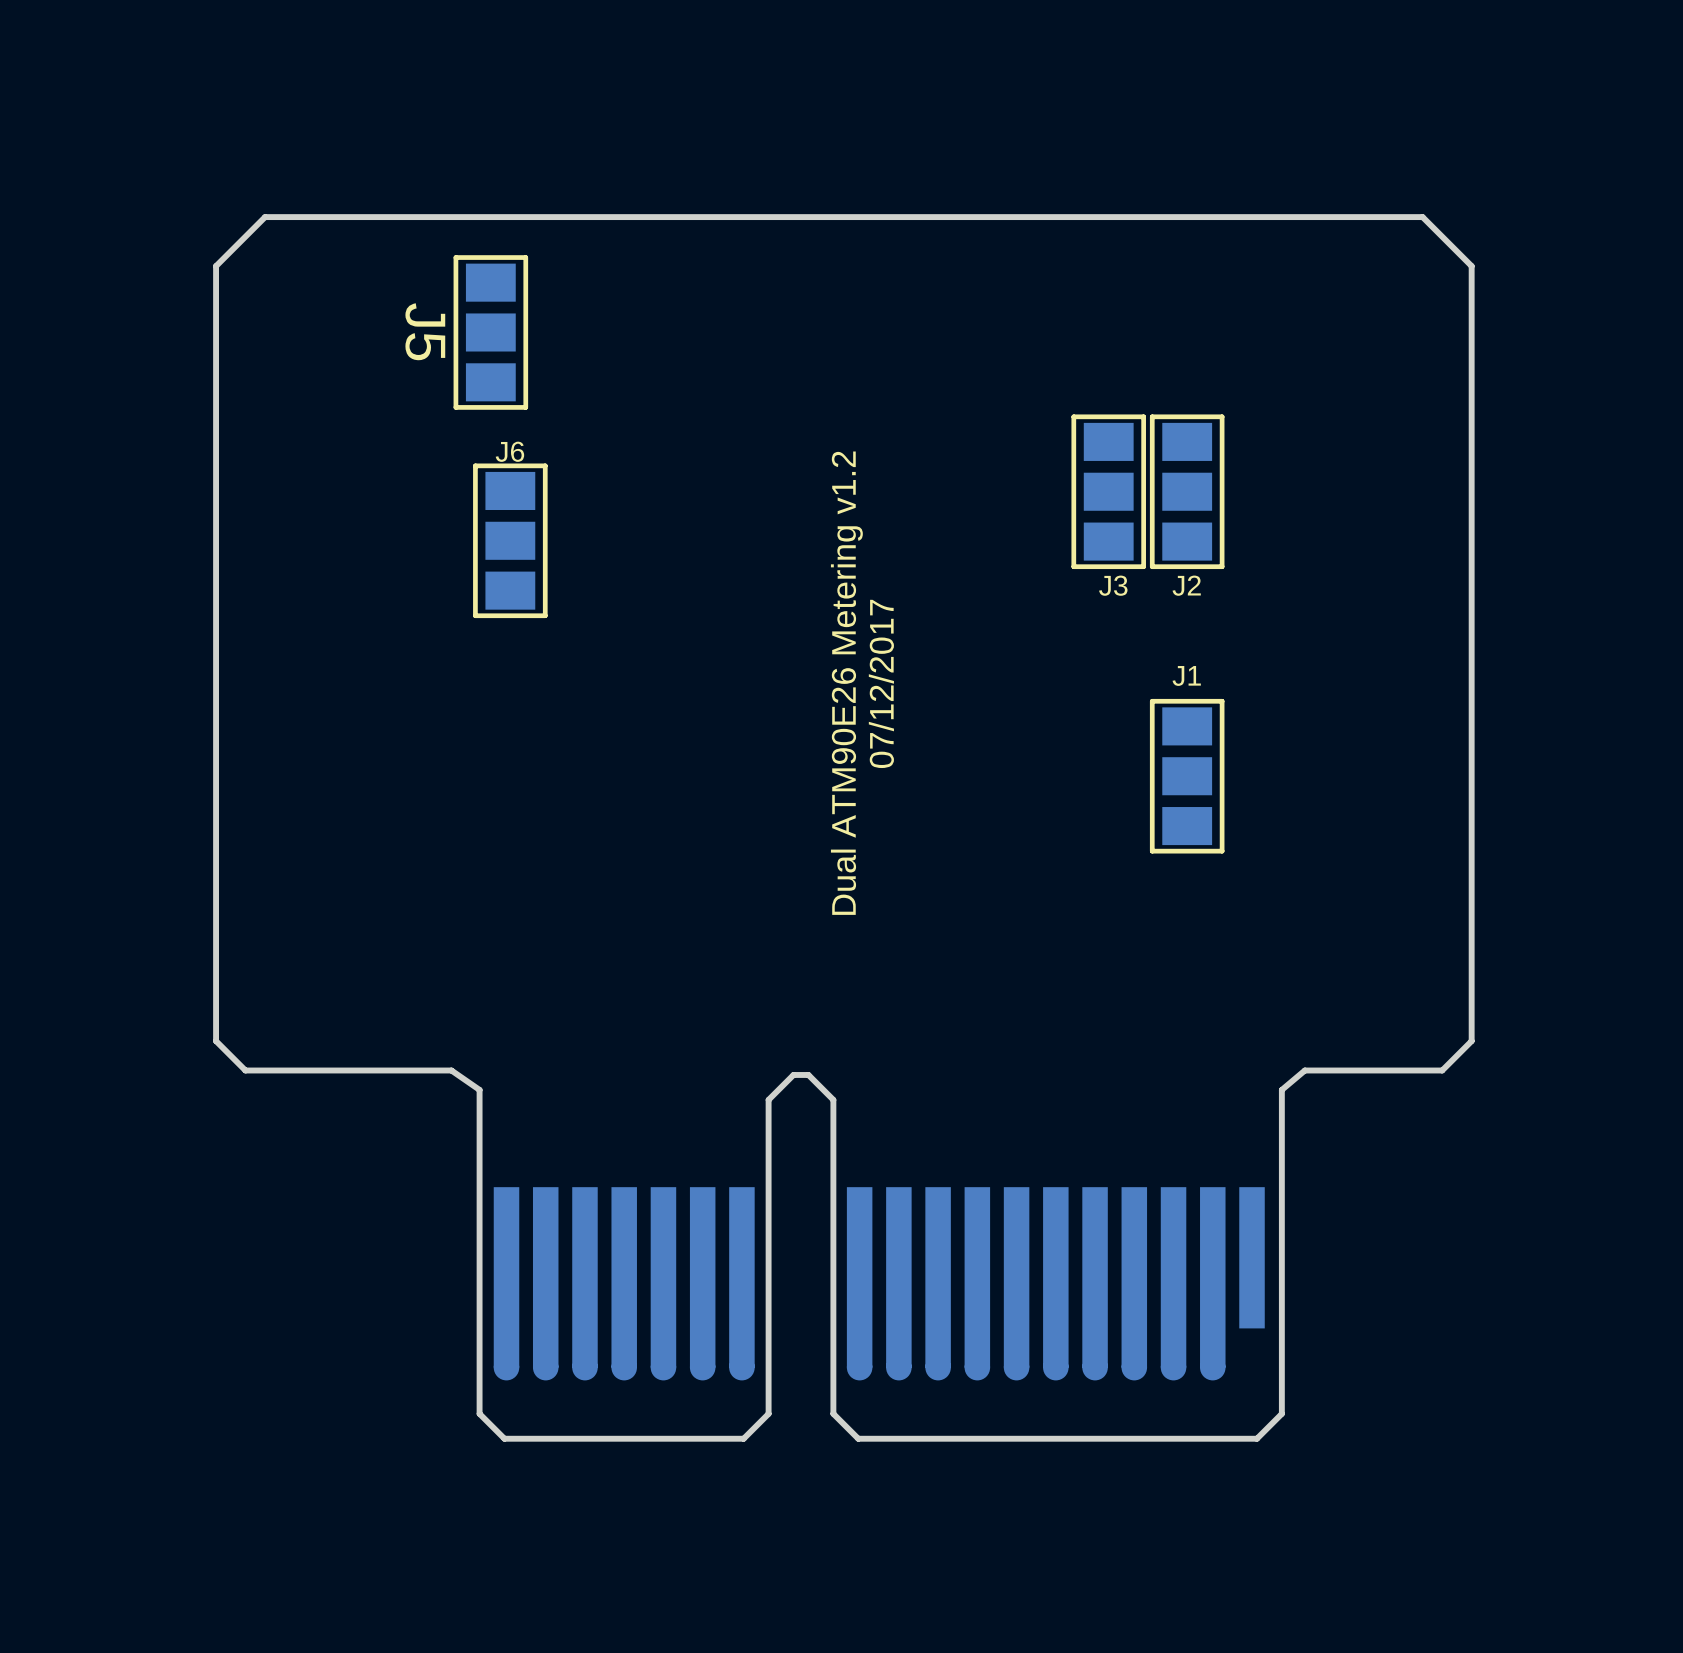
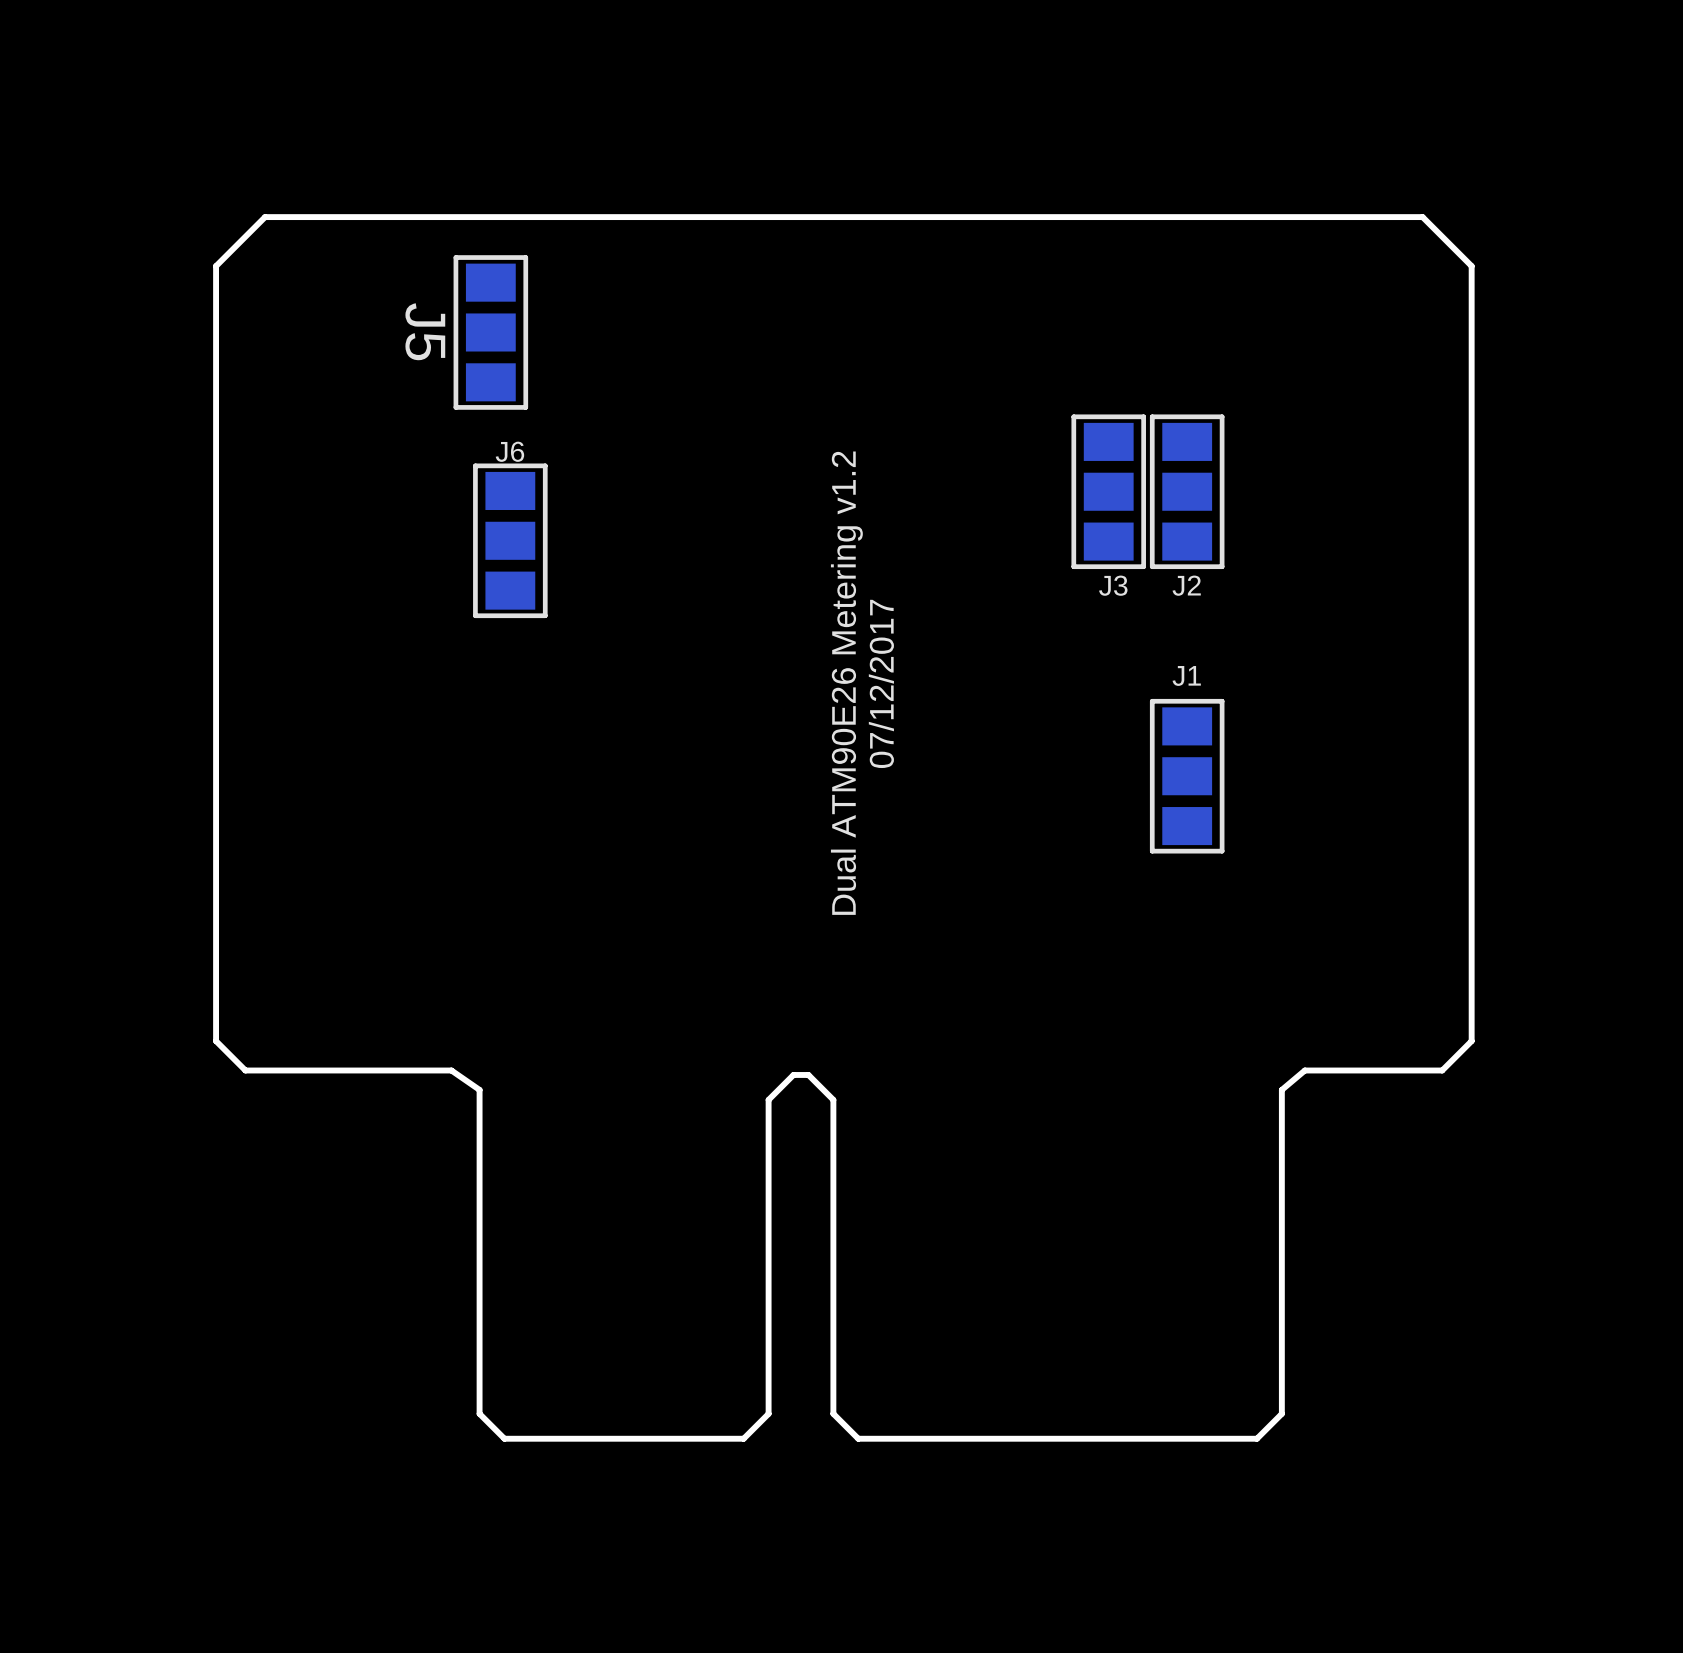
part: (879, 1283) -> none

